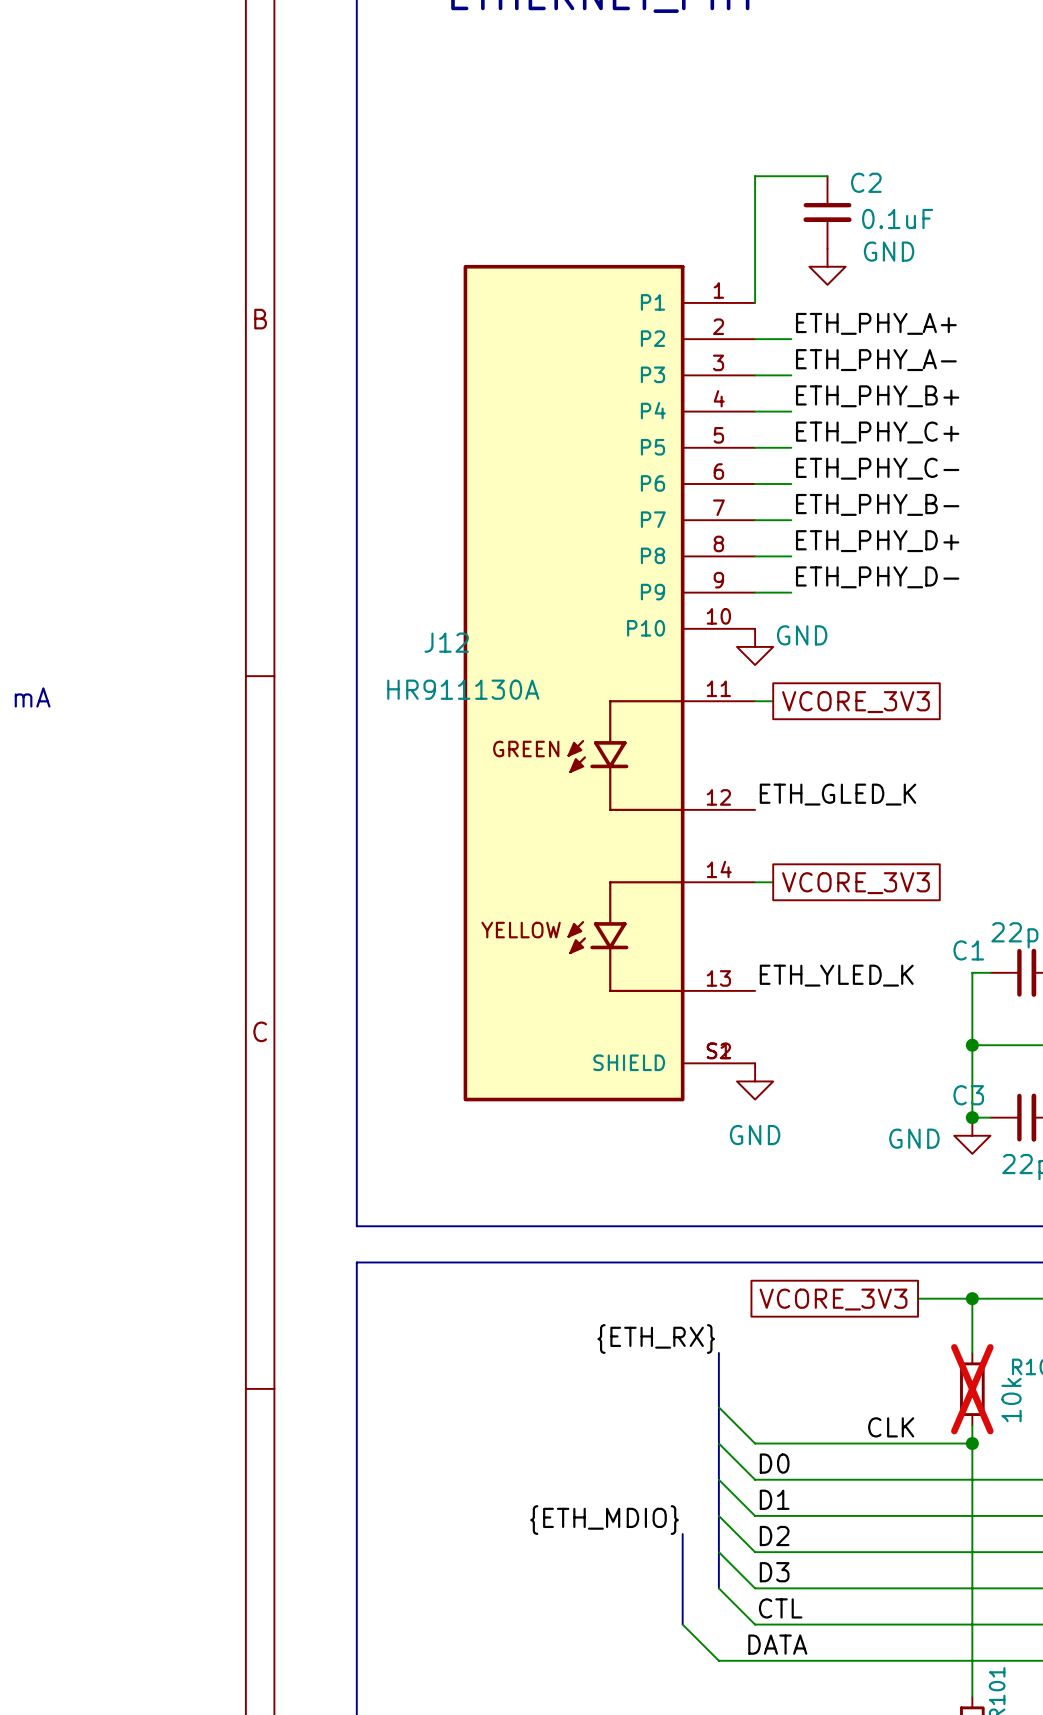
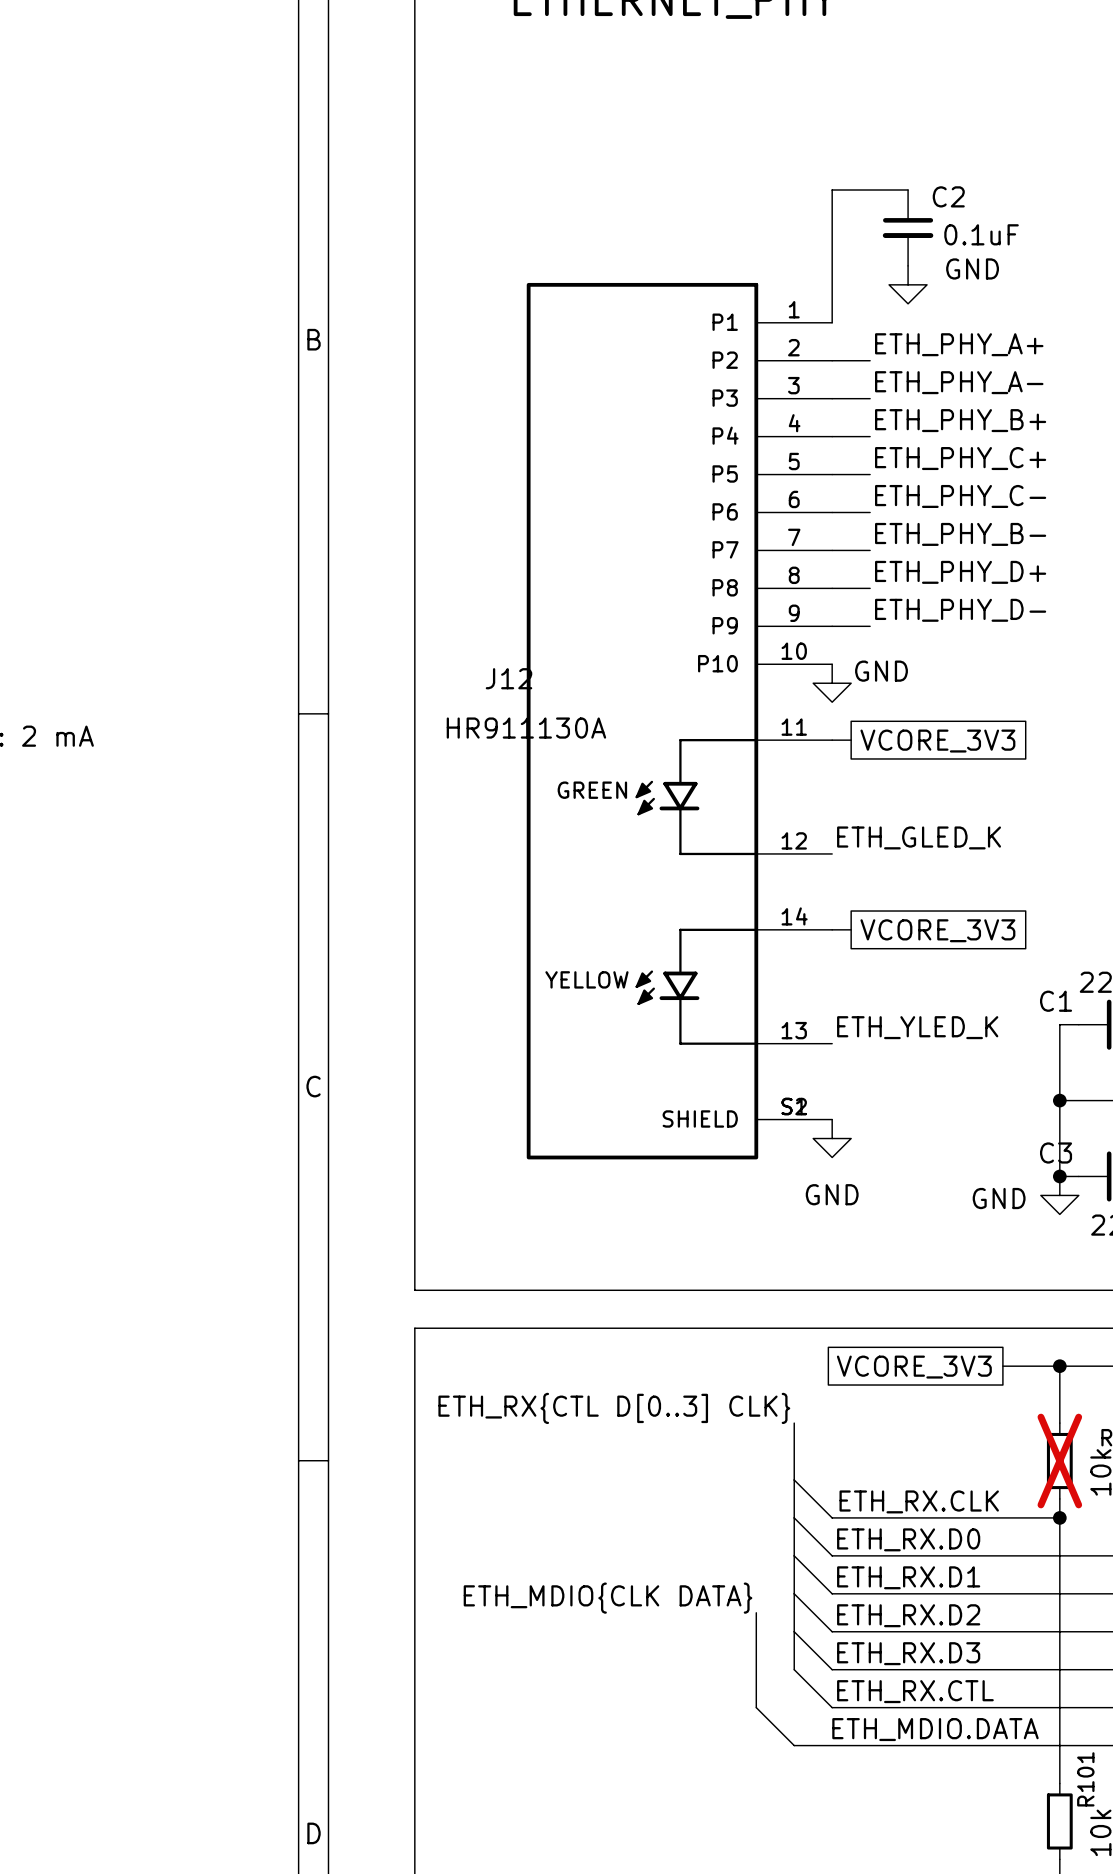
label: {ETH_RX} (656, 1339) -> ETH_RX{CTL D[0..3] CLK} (614, 1408)
label: CLK (891, 1427) -> ETH_RX.CLK (919, 1501)
label: D0 (774, 1463) -> ETH_RX.D0 (908, 1539)
label: D1 (774, 1499) -> ETH_RX.D1 (908, 1577)
label: {ETH_MDIO} (604, 1520) -> ETH_MDIO{CLK DATA} (608, 1598)
label: D2 (774, 1535) -> ETH_RX.D2 (908, 1615)
label: D3 (774, 1572) -> ETH_RX.D3 (908, 1653)
label: CTL (780, 1608) -> ETH_RX.CTL (915, 1691)
label: DATA (777, 1644) -> none
label: none -> ETH_MDIO.DATA (935, 1729)

